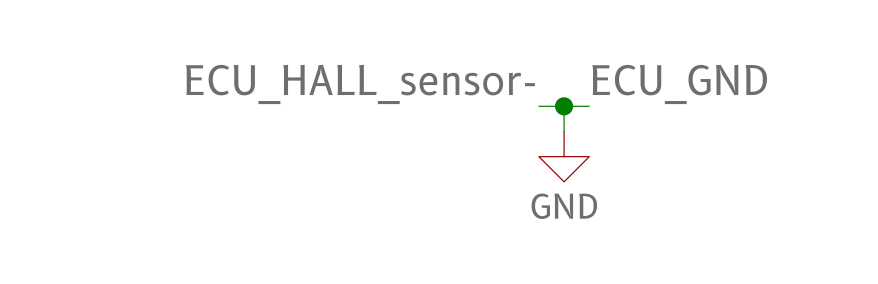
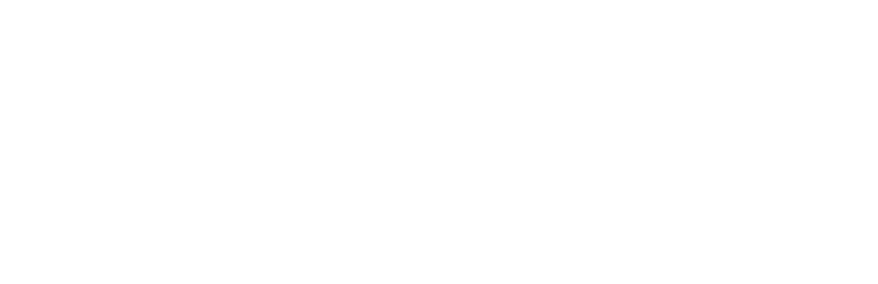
label: ECU_HALL_sensor- (360, 84) -> none
label: ECU_GND (679, 84) -> none
wire: (538, 106) (589, 106) -> none
wire: (564, 106) (564, 131) -> none
junction: (564, 106) -> none
power symbol: GND (564, 156) -> none

